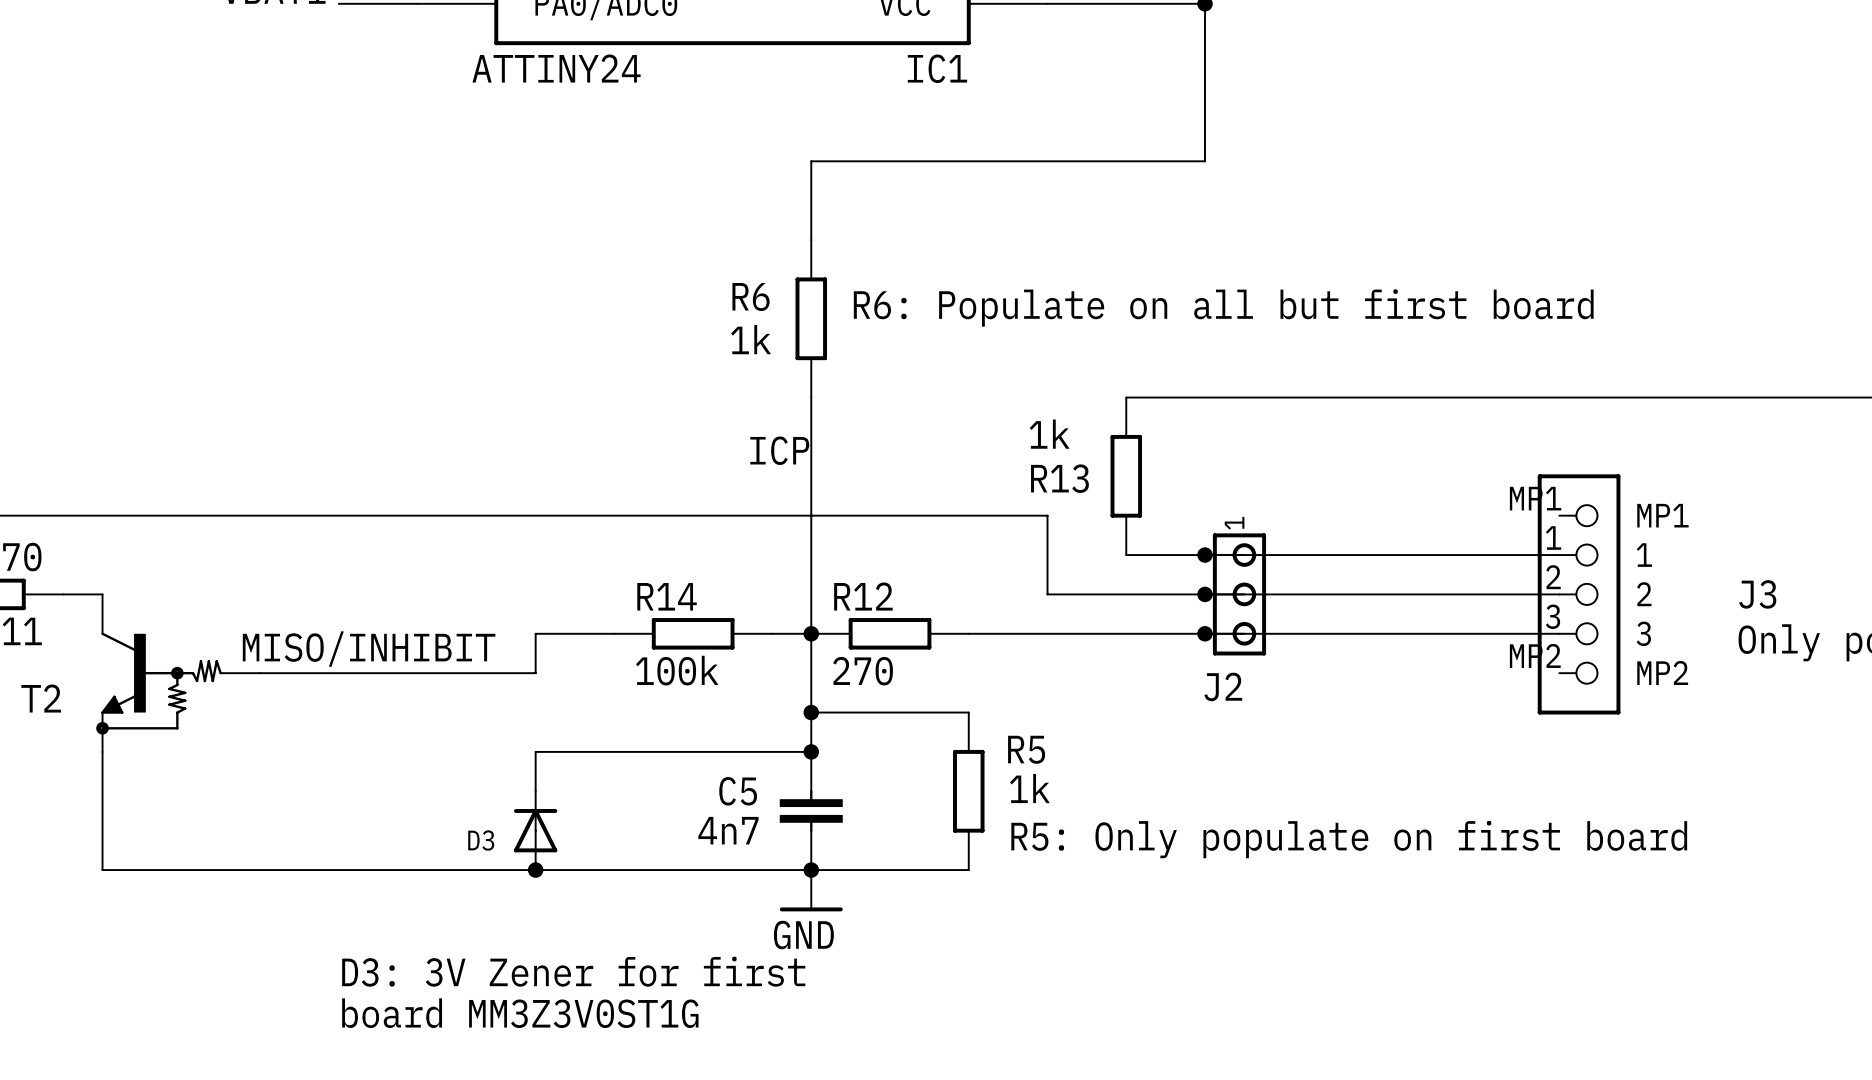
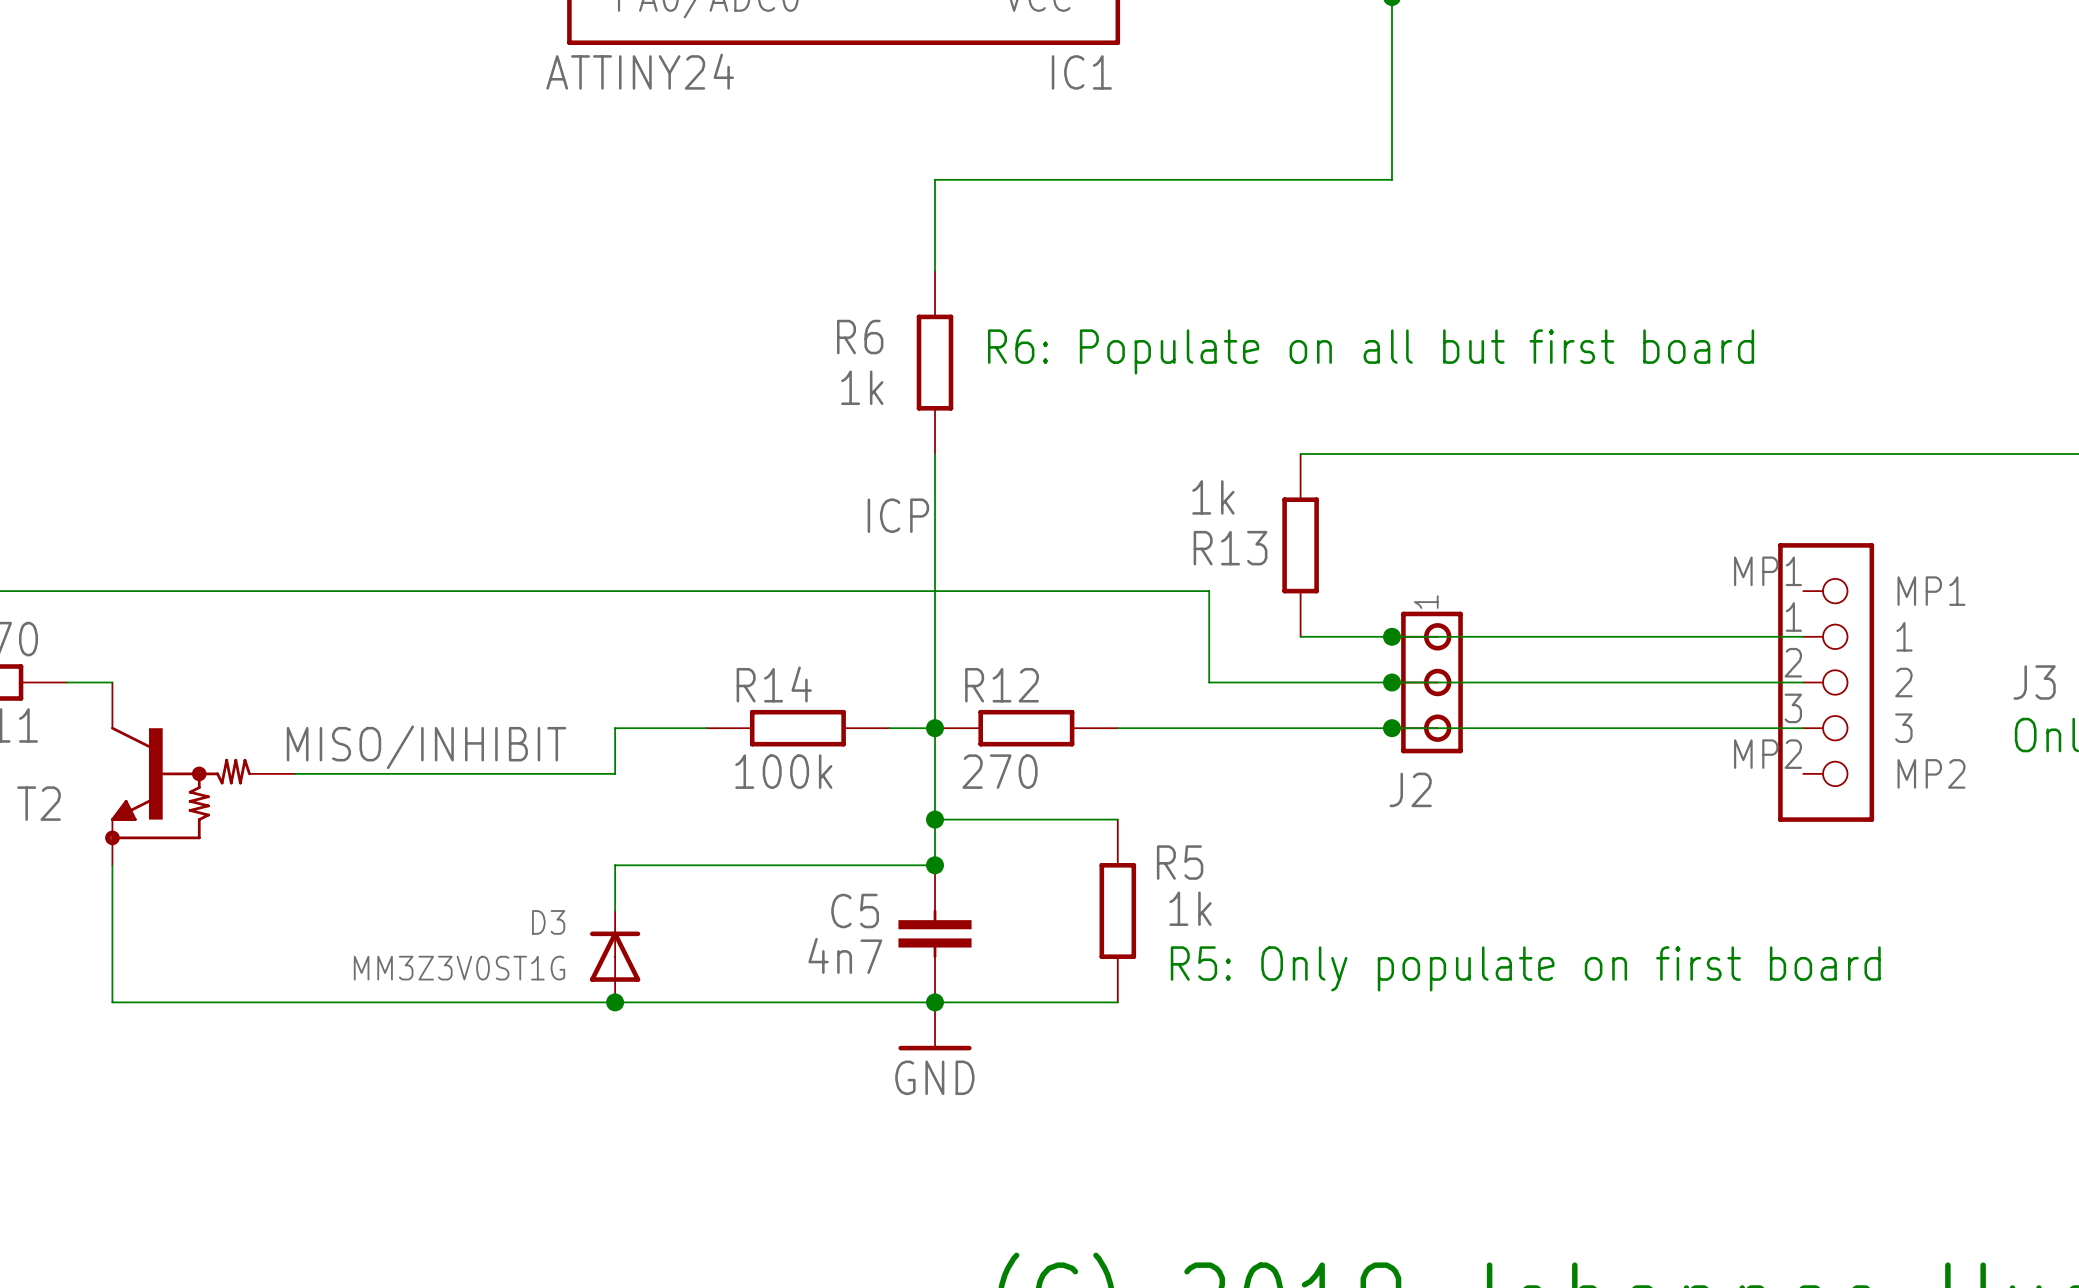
D3 value: none -> MM3Z3V0ST1G (459, 968)
D3 name position: D3 (481, 840) -> D3 (548, 922)
text: D3: 3V Zener for first (573, 971) -> none
text: board MM3Z3V0ST1G (520, 1013) -> none

